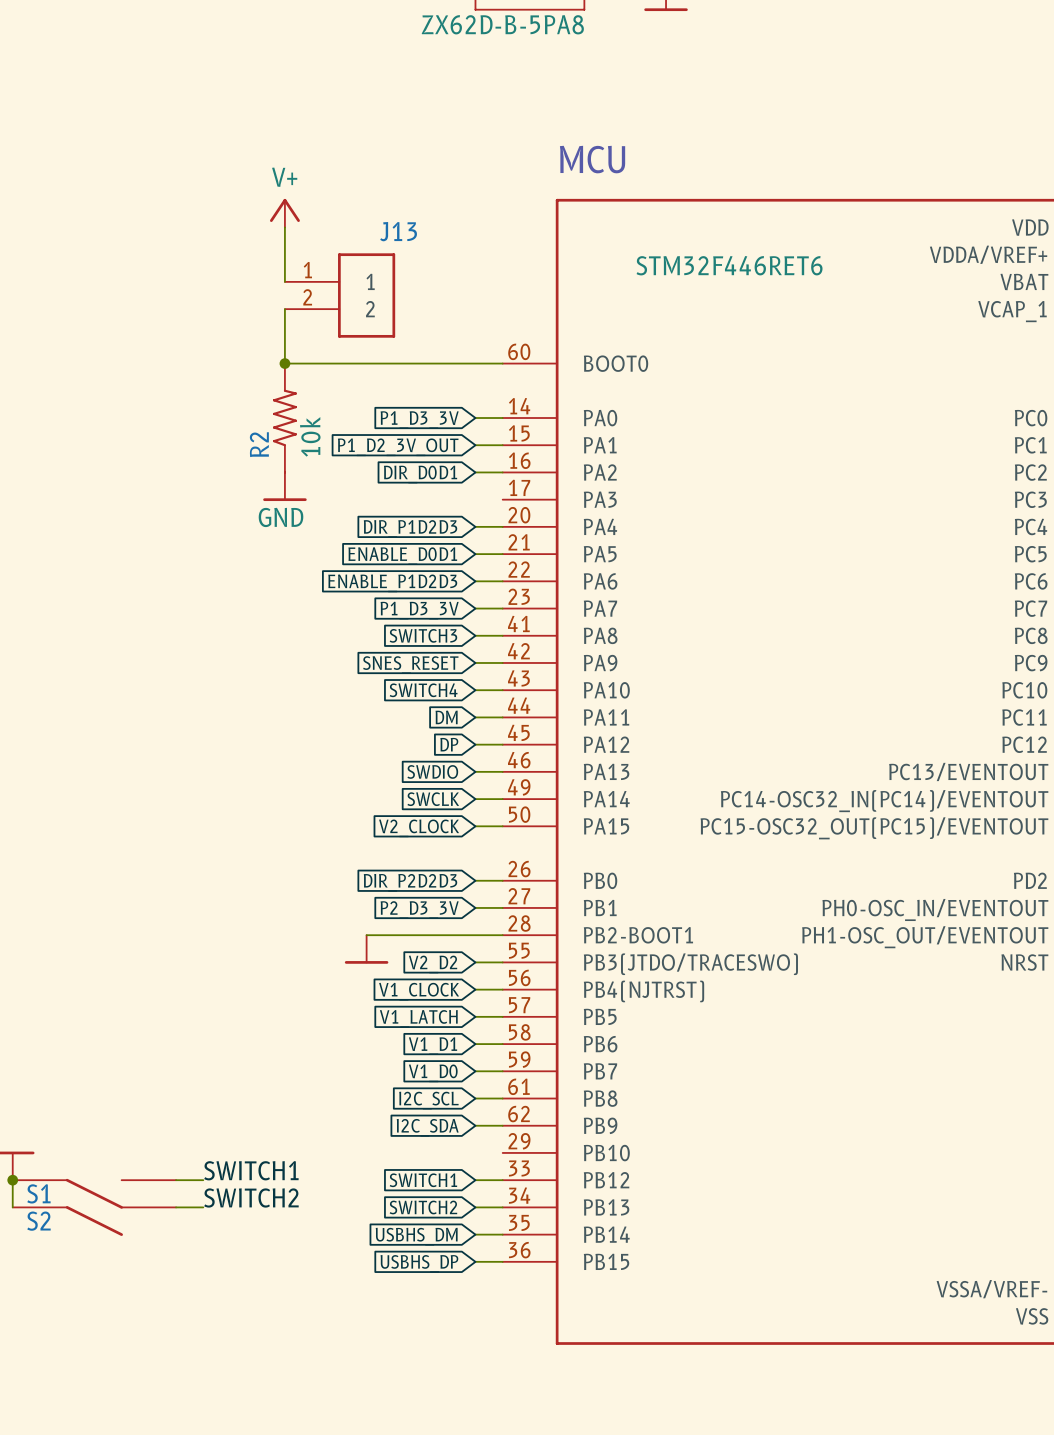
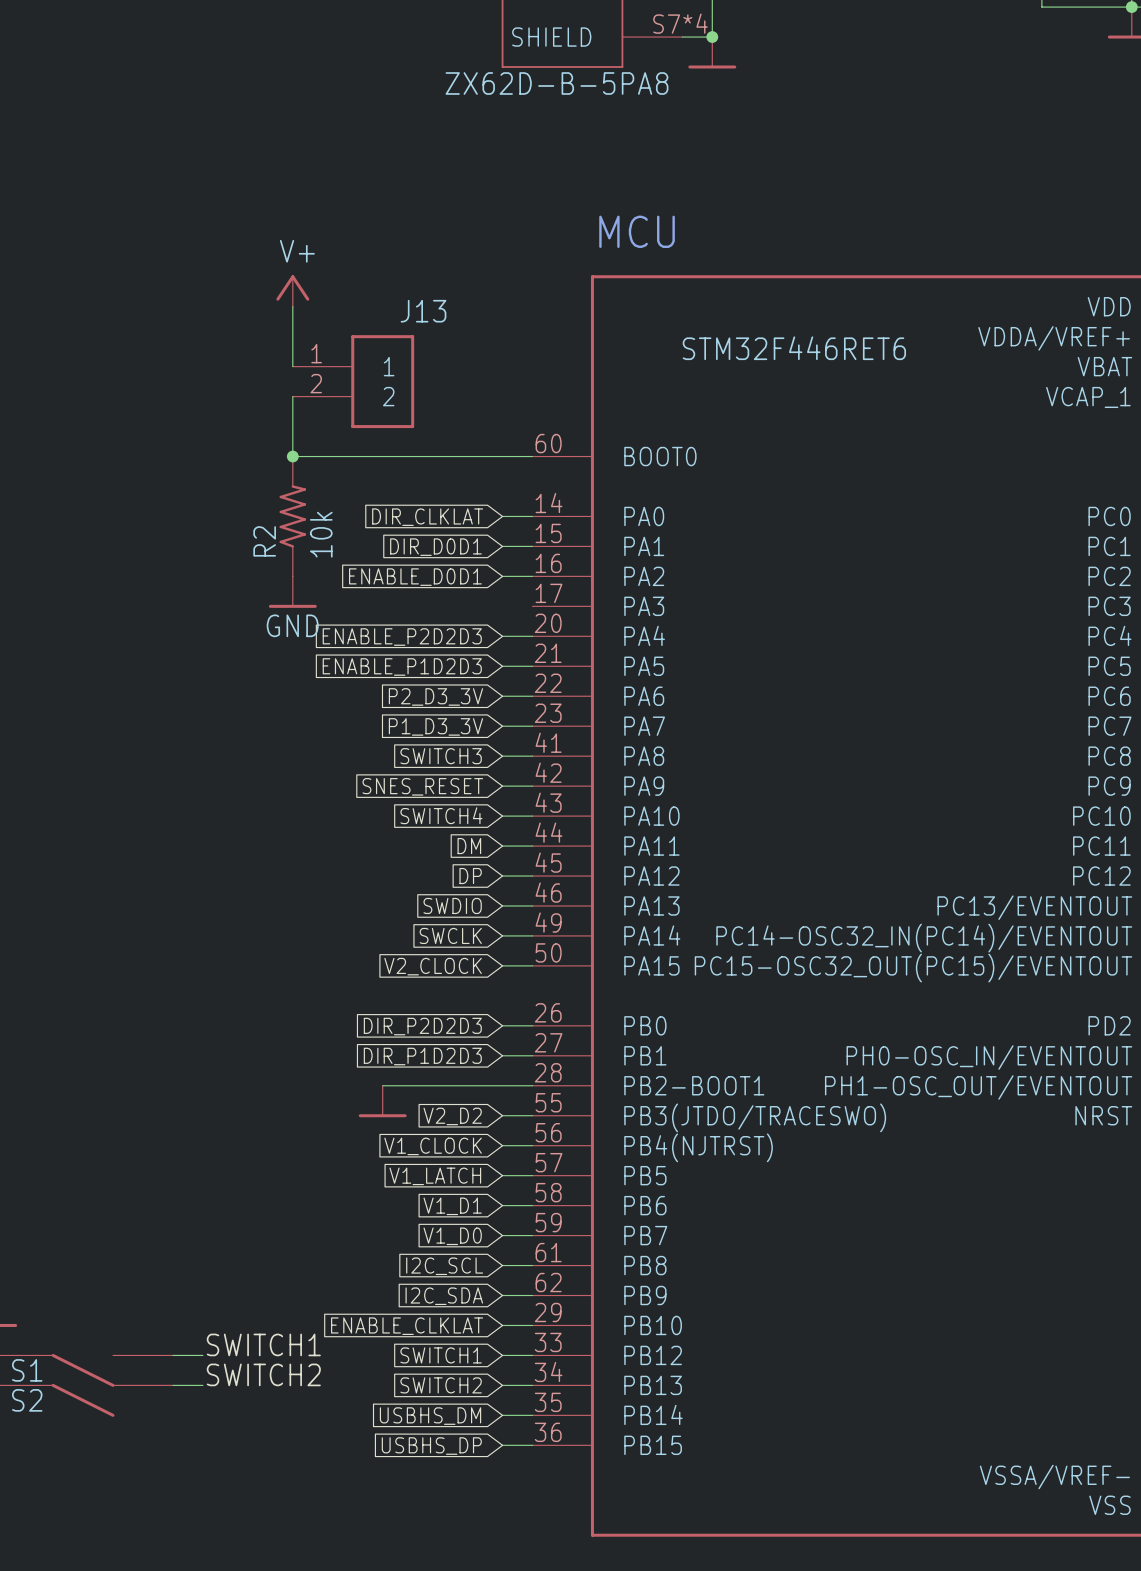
global label: P1_D3_3V (419, 420) -> DIR_CLKLAT (427, 517)
global label: P1_D2_3V_OUT (398, 447) -> DIR_D0D1 (435, 547)
global label: DIR_D0D1 (420, 474) -> ENABLE_D0D1 (415, 577)
global label: DIR_P1D2D3 (410, 528) -> ENABLE_P2D2D3 (402, 637)
global label: ENABLE_D0D1 (402, 556) -> ENABLE_P1D2D3 (402, 666)
global label: ENABLE_P1D2D3 (392, 583) -> P2_D3_3V (435, 696)
global label: P2_D3_3V (419, 910) -> DIR_P1D2D3 (422, 1056)
wire: none -> (502, 1325) (532, 1325)
global label: none -> ENABLE_CLKLAT (407, 1326)

